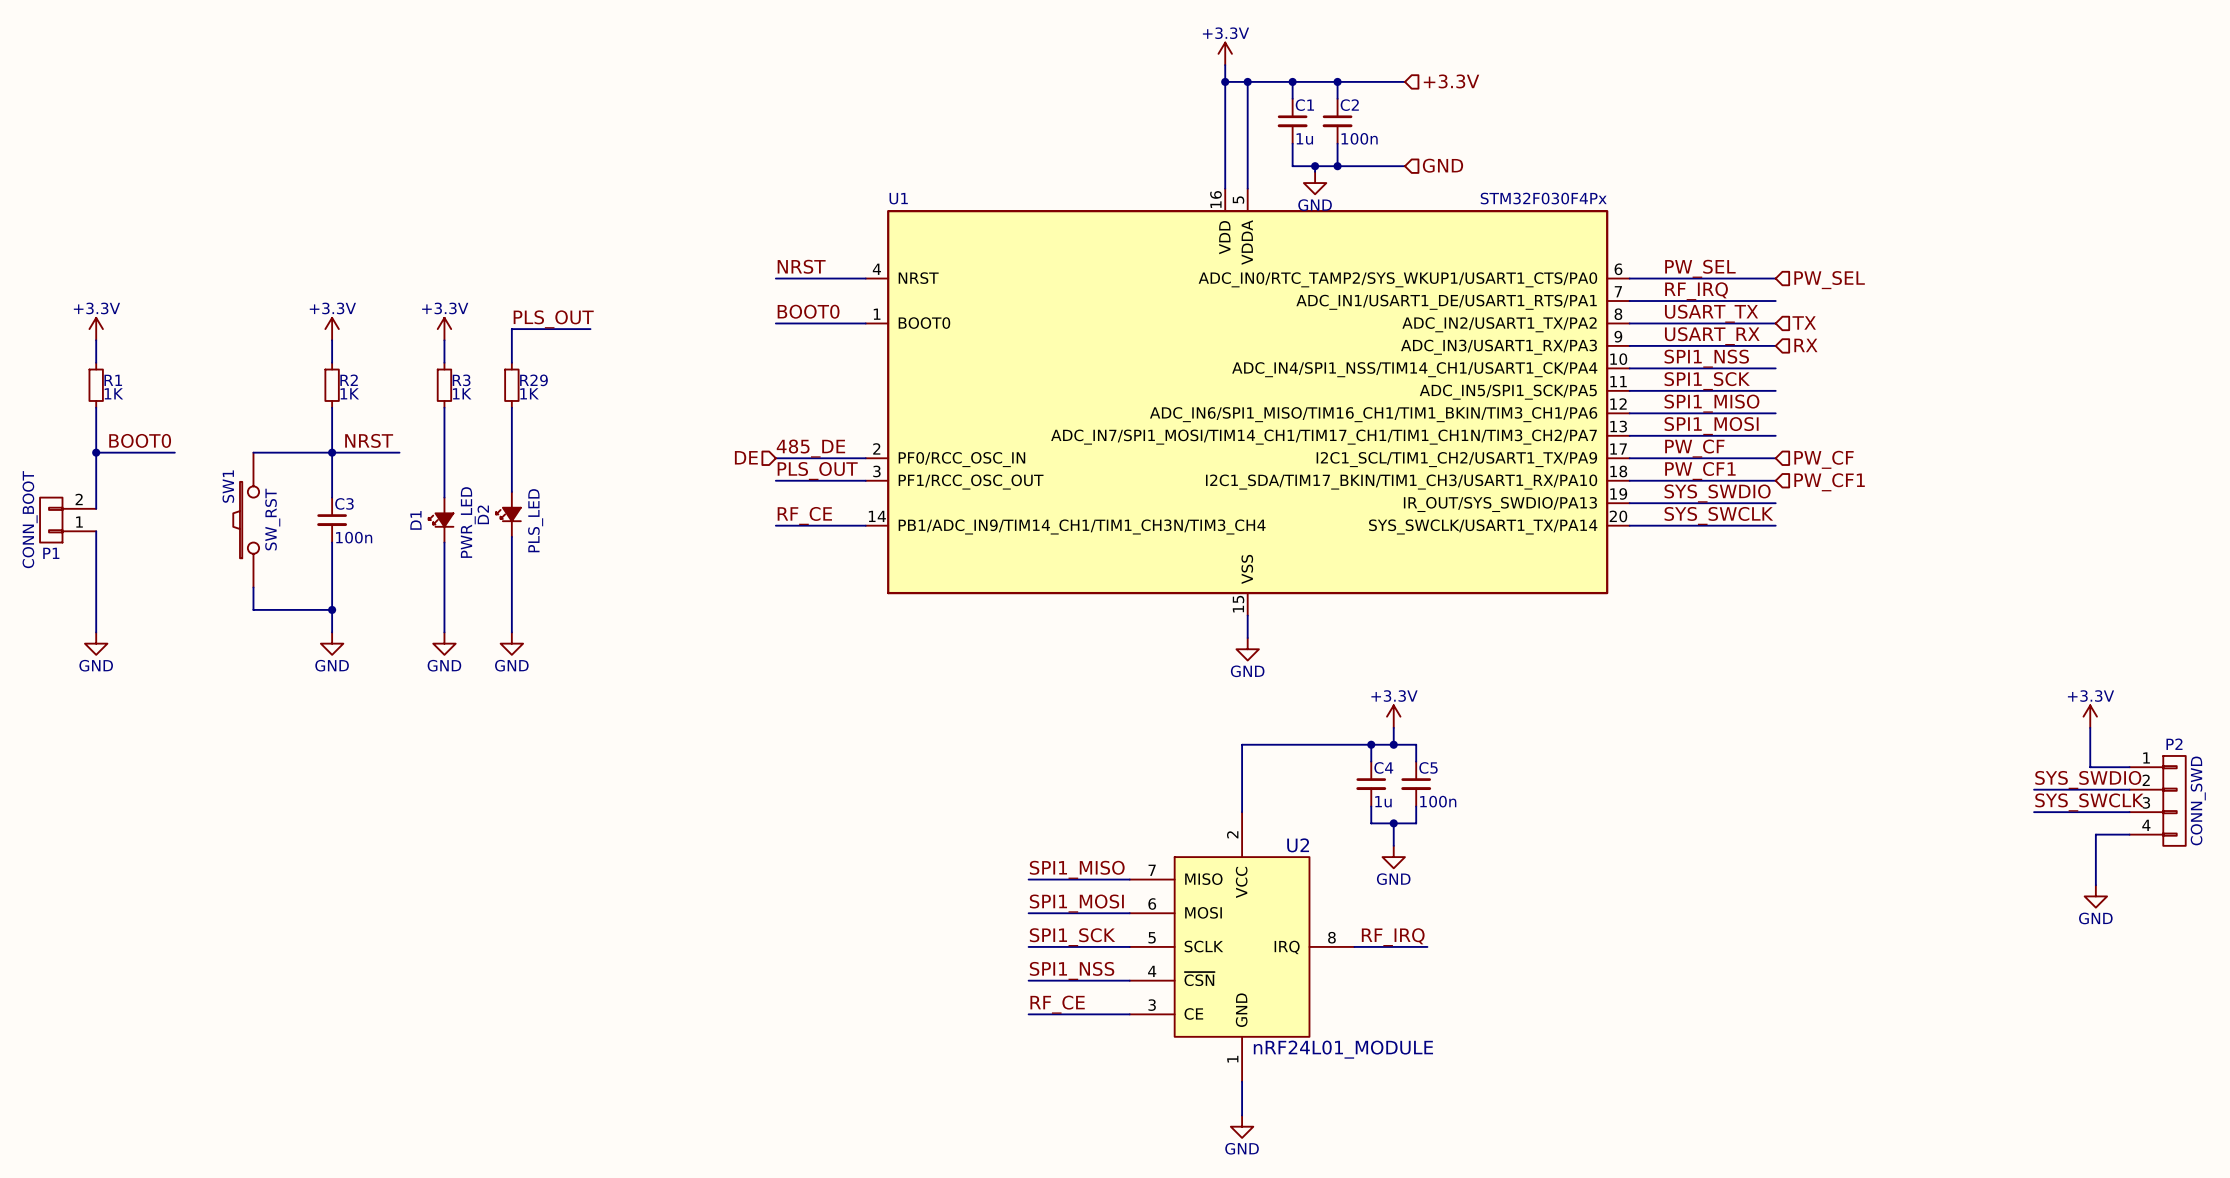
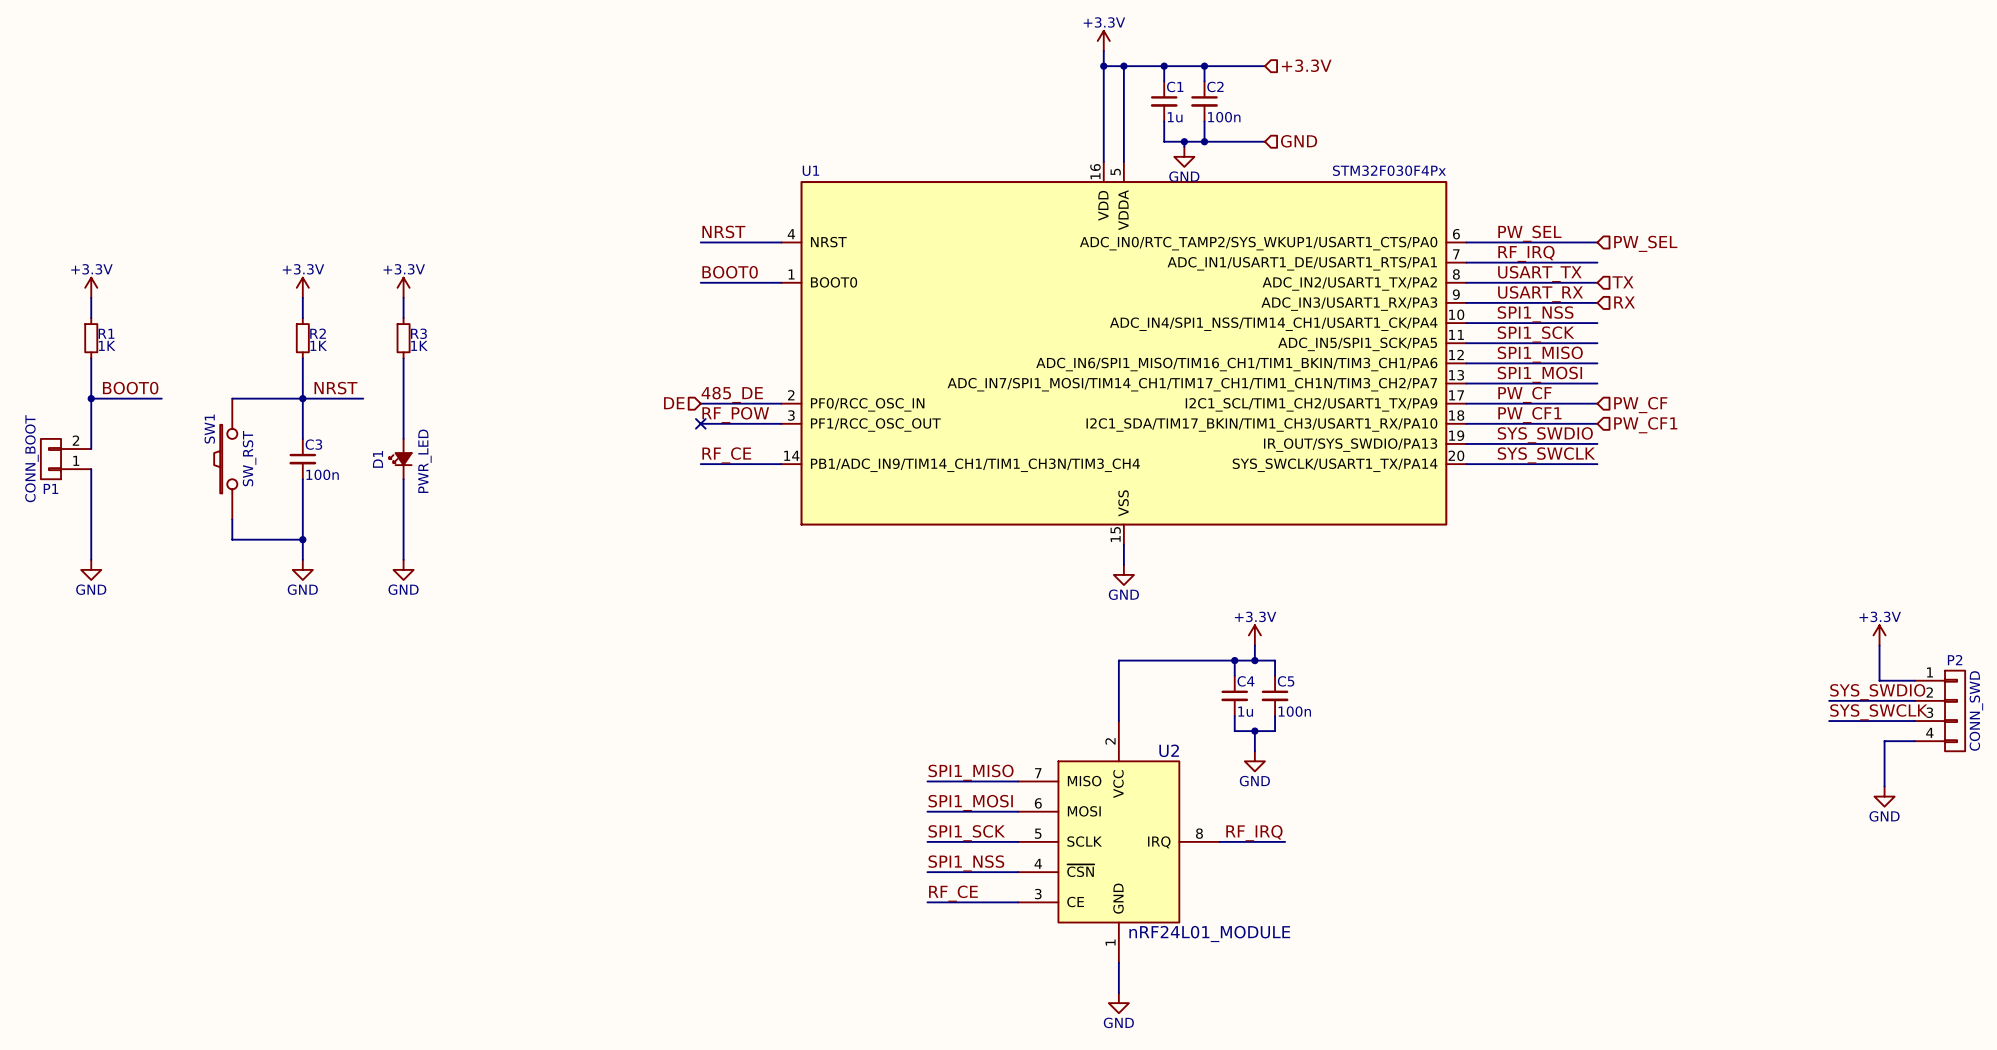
label: PLS_OUT (553, 319) -> none
wire: (590, 329) (511, 329) (511, 362) -> none
R29: 1K (511, 385) -> none
wire: (511, 407) (511, 491) -> none
label: PLS_OUT (817, 471) -> RF_POW (735, 415)
no-connect mark: none -> (700, 423)
D2: PLS_LED (508, 514) -> none
wire: (511, 536) (511, 632) -> none
power symbol: GND (511, 643) -> none

